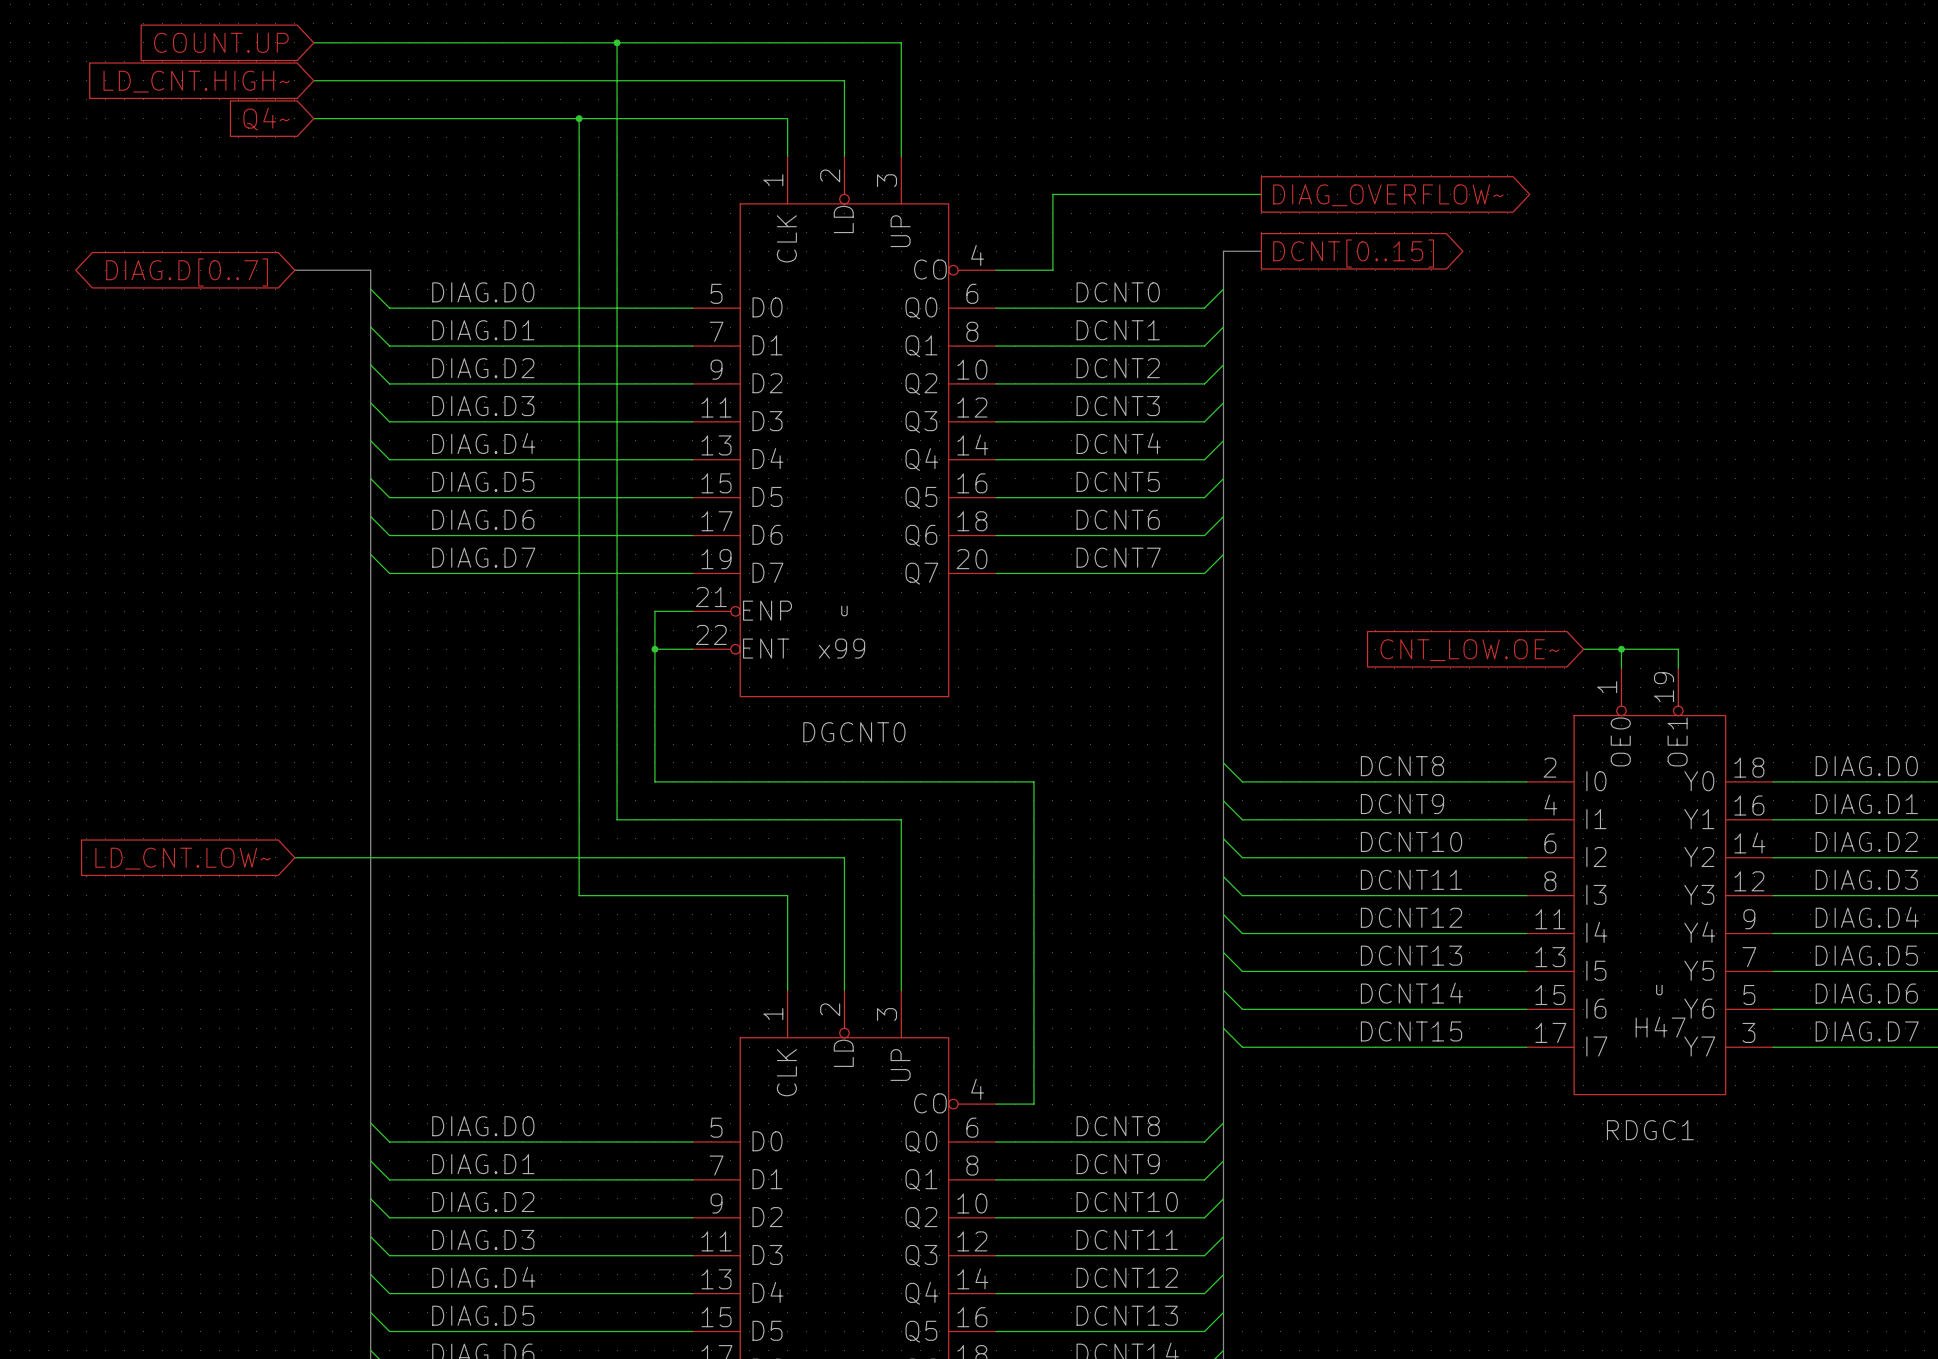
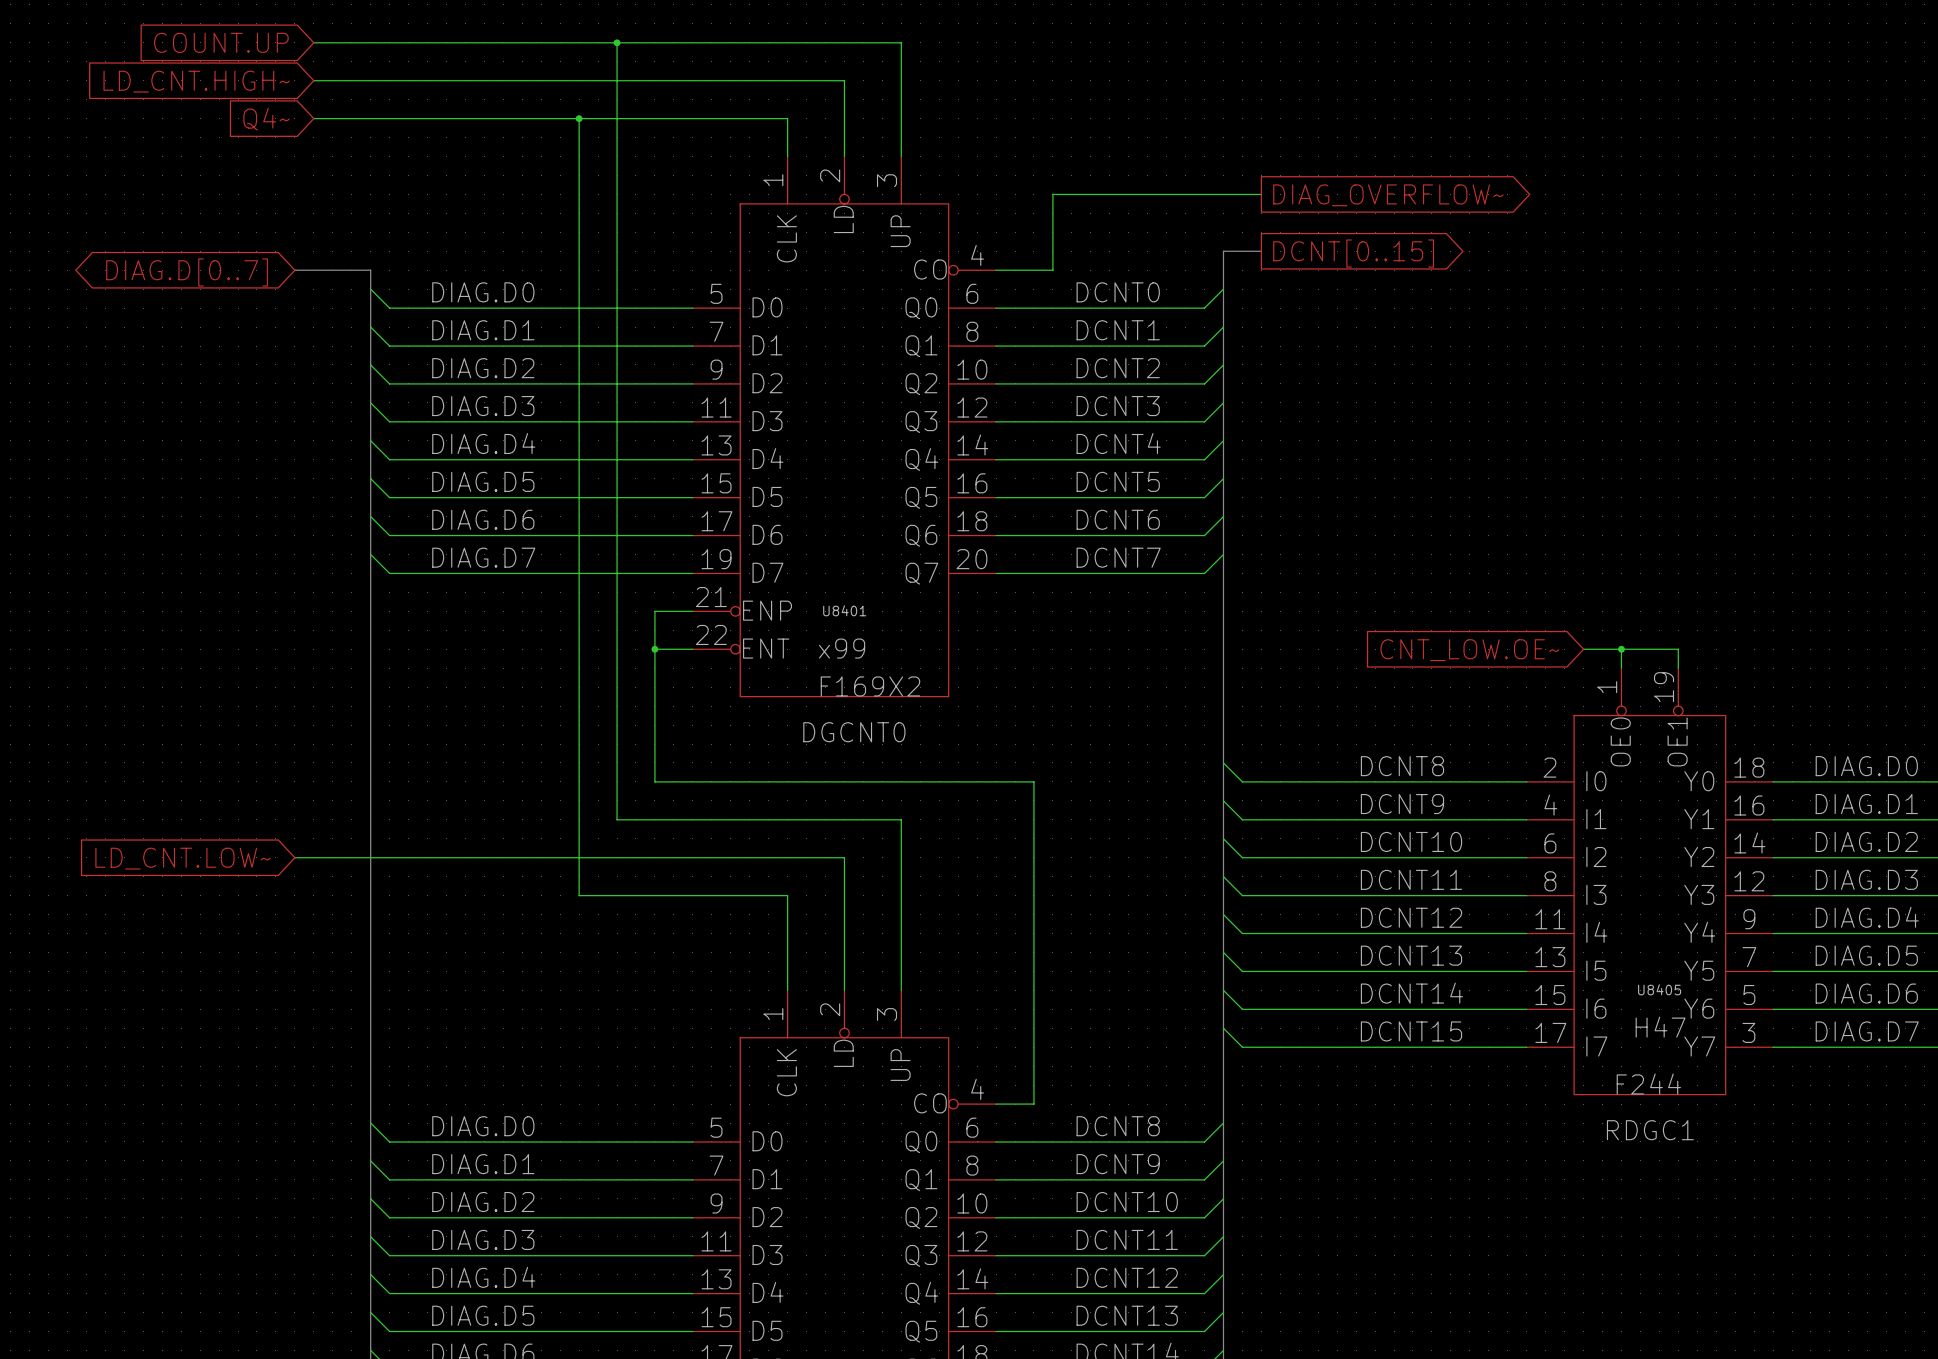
U name: U (844, 611) -> U8401 (844, 610)
U value: none -> F169X2 (870, 686)
U name: U (1659, 990) -> U8405 (1659, 989)
U value: none -> F244 (1648, 1083)

